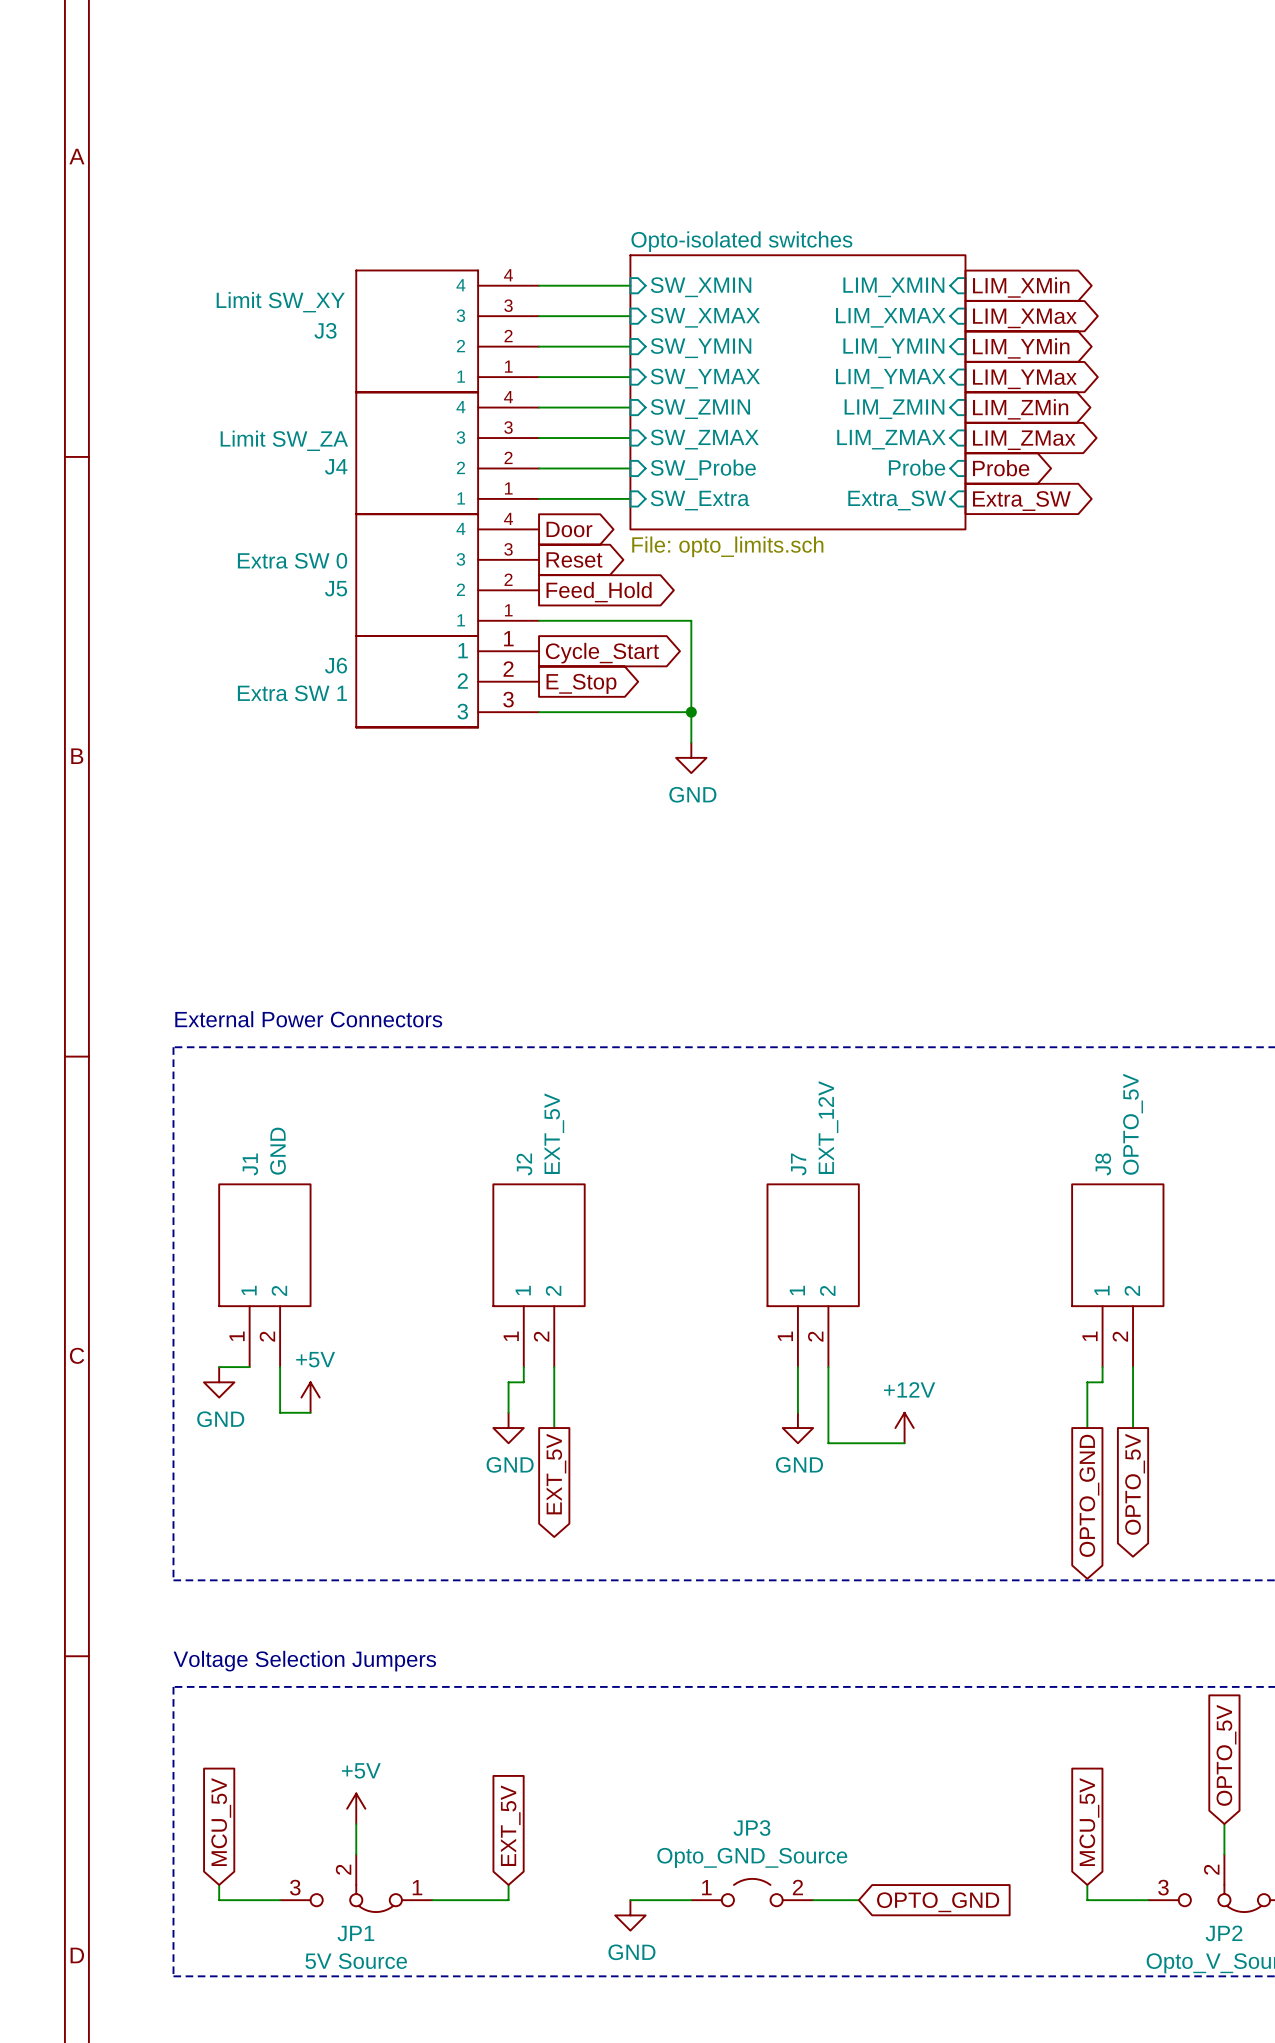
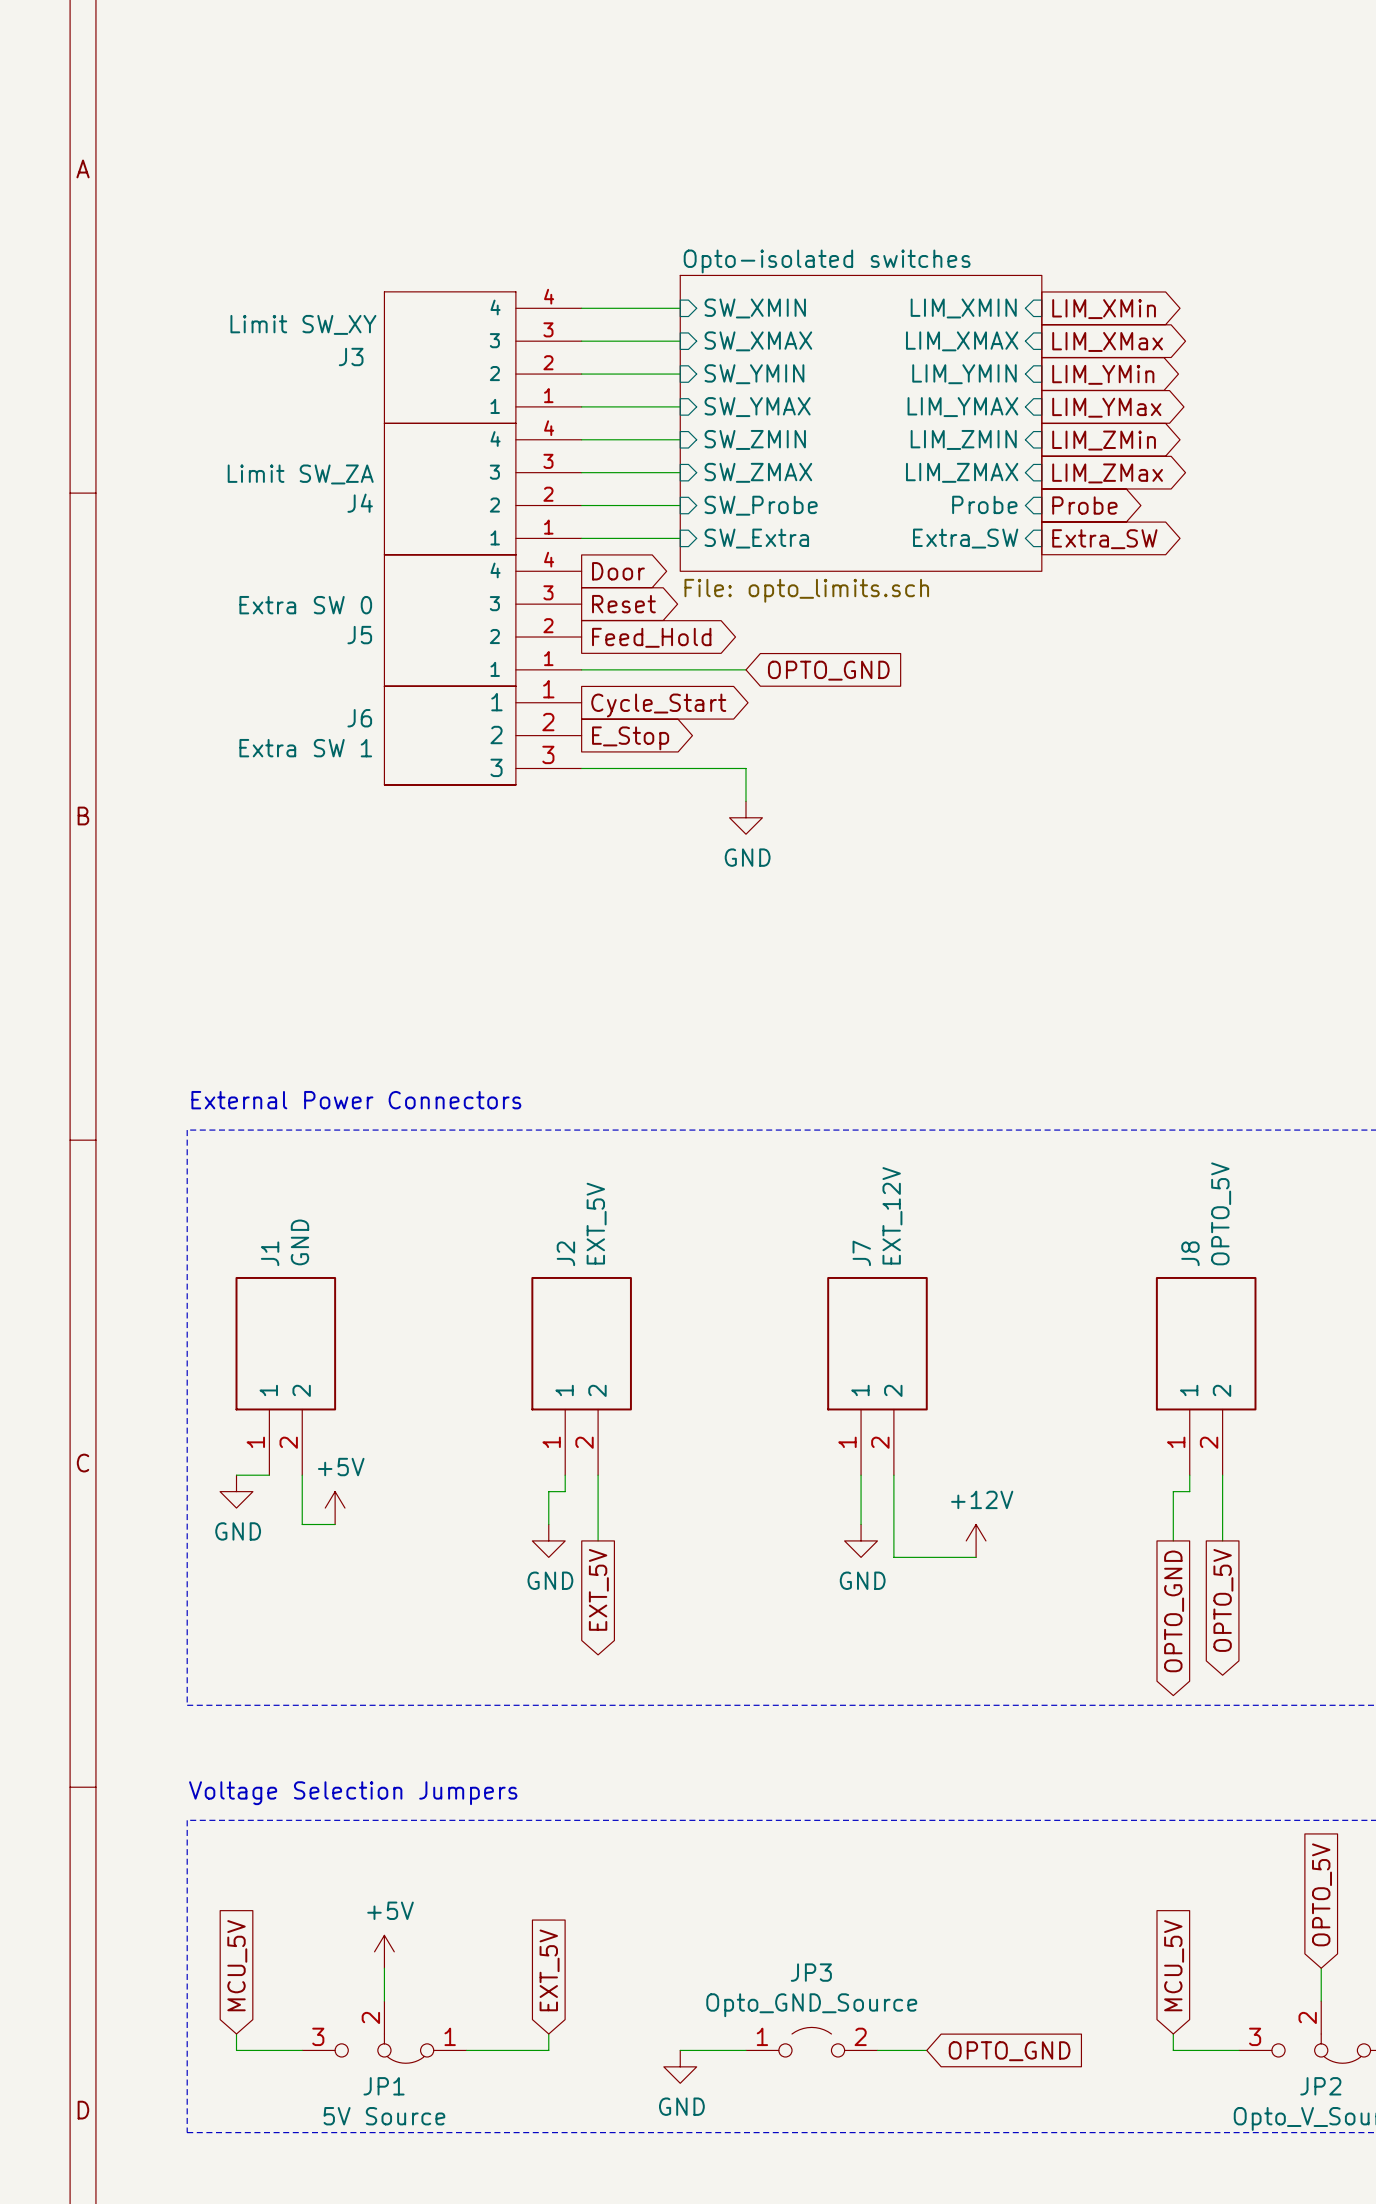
wire: (691, 620) (691, 712) -> none
global label: none -> OPTO_GND (828, 670)
junction: (691, 712) -> none

